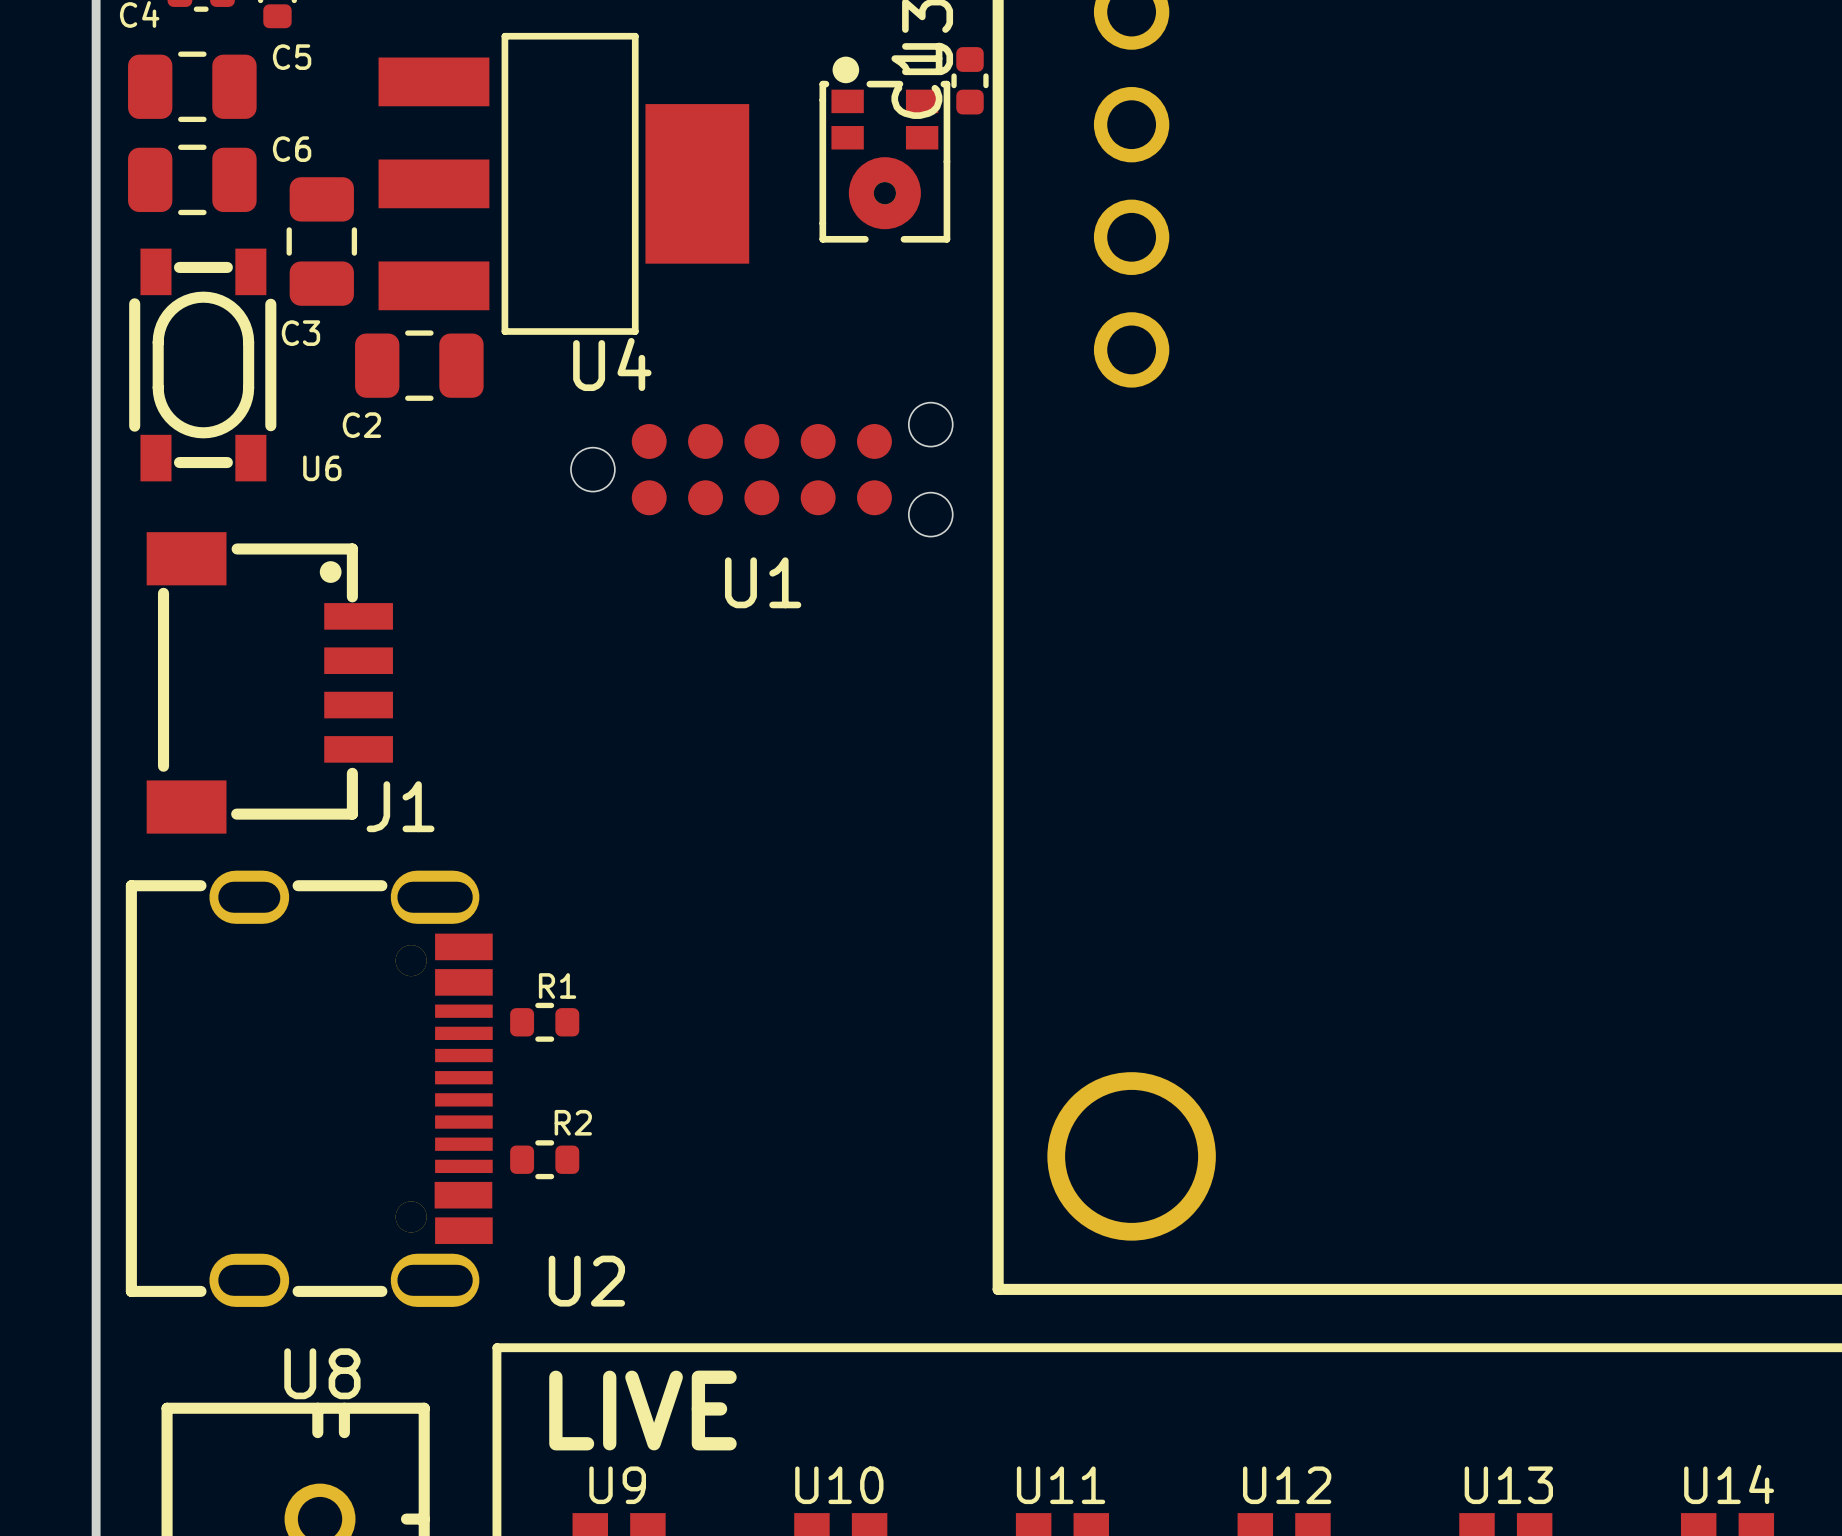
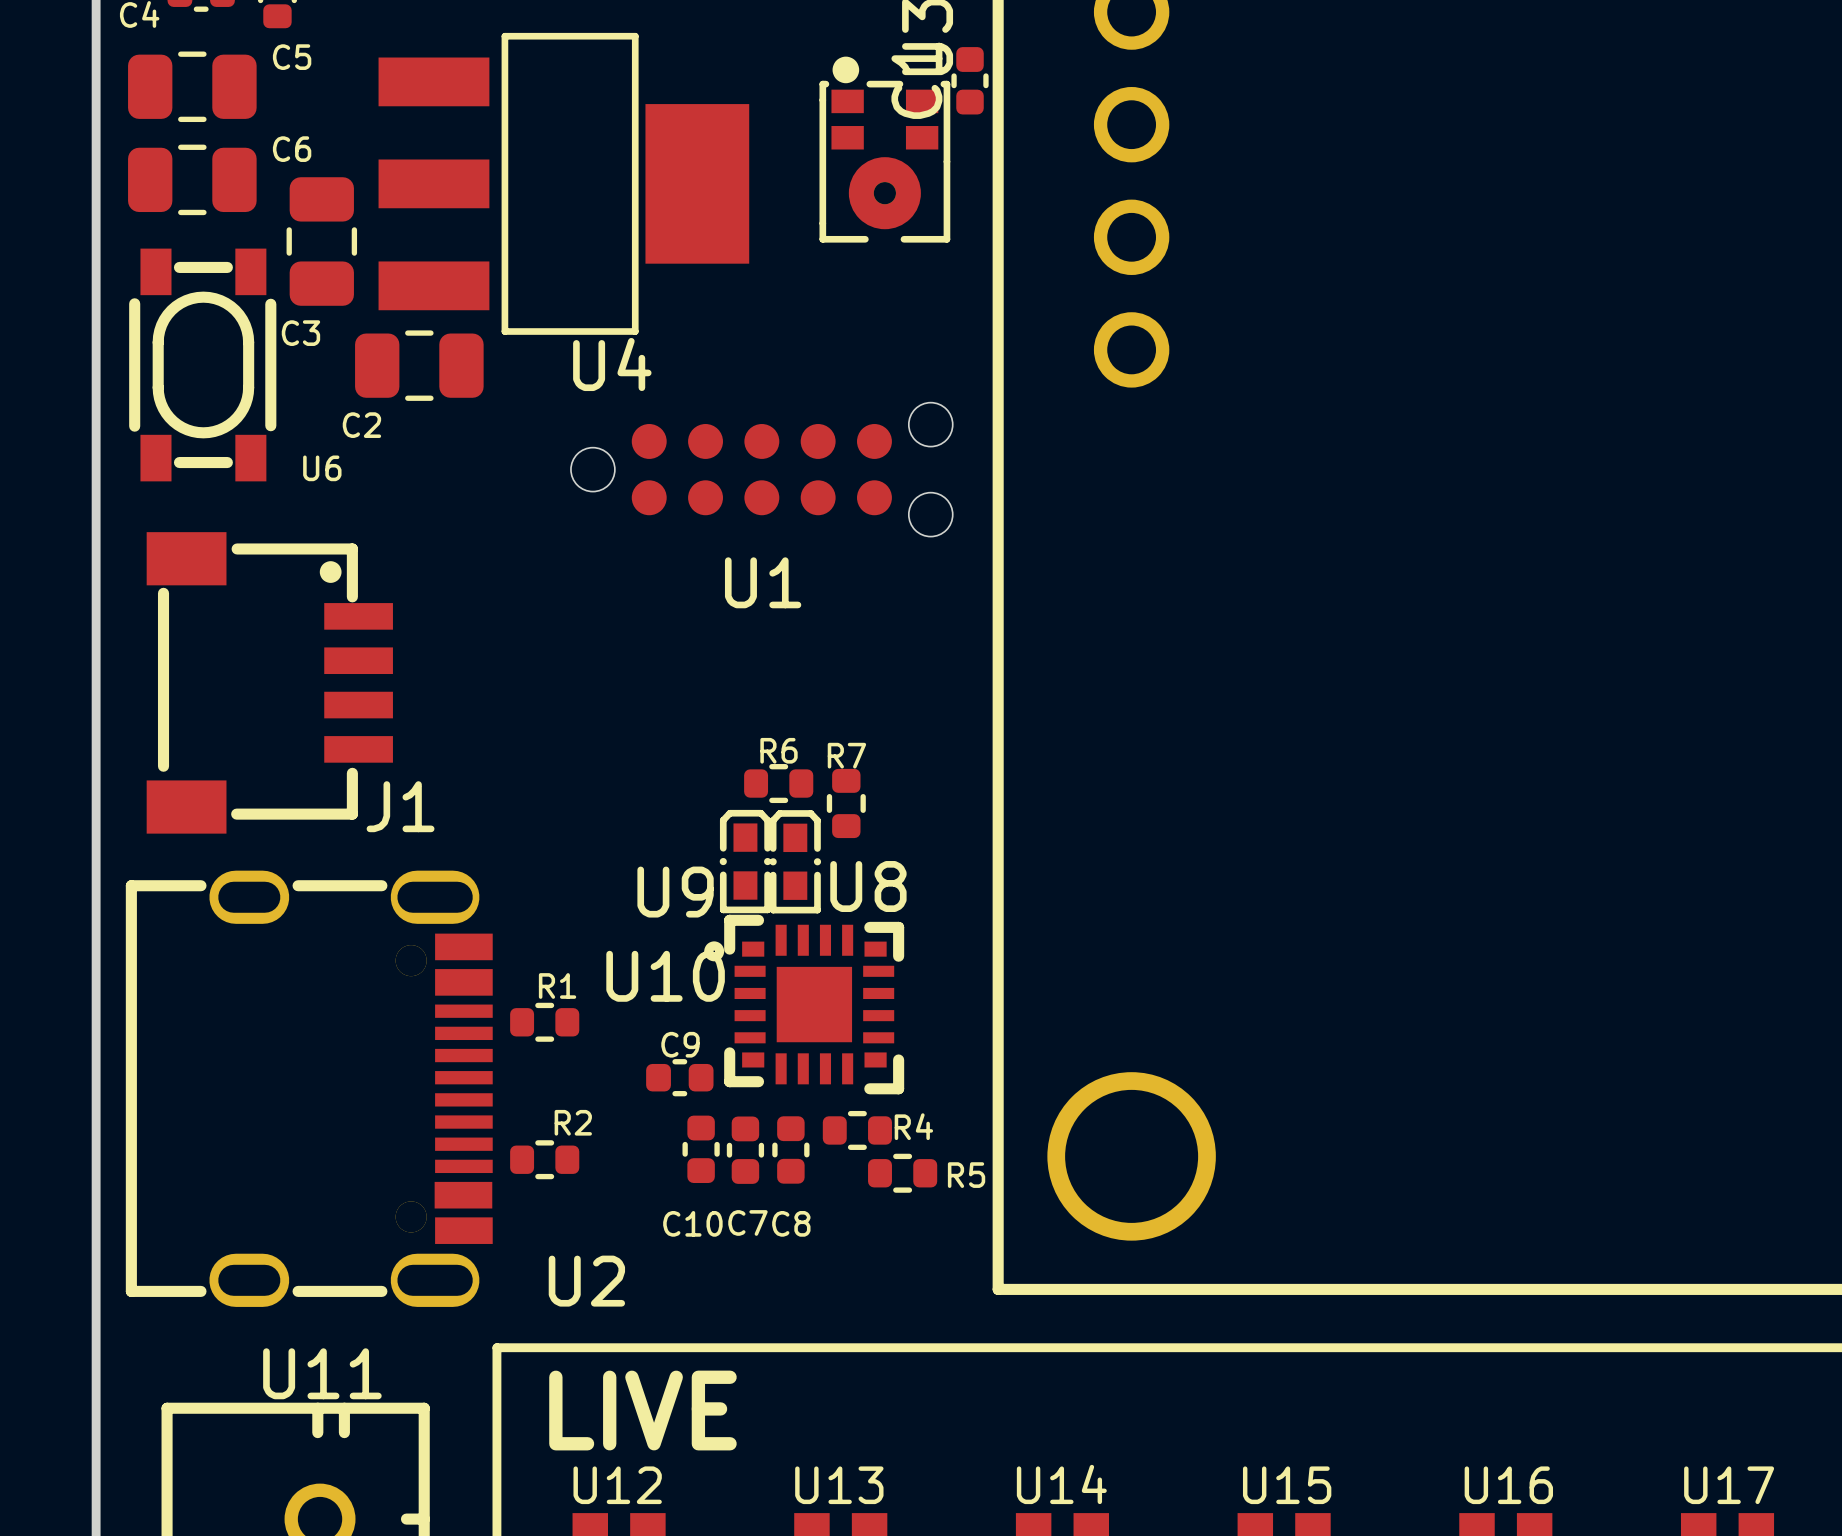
R6: none -> (778, 783)
R7: none -> (846, 803)
U9: none -> (745, 861)
U8: none -> (795, 861)
U10: none -> (804, 1004)
C9: none -> (679, 1077)
R4: none -> (857, 1130)
C10: none -> (701, 1149)
C8: none -> (790, 1149)
C7: none -> (745, 1150)
R5: none -> (902, 1173)
U8 name: U8 (322, 1373) -> U11 (322, 1373)
U14 name: U14 (1729, 1484) -> U17 (1729, 1485)
U9 name: U9 (617, 1485) -> U12 (617, 1485)
U10 name: U10 (839, 1485) -> U13 (839, 1485)
U11 name: U11 (1061, 1485) -> U14 (1061, 1484)
U12 name: U12 (1287, 1485) -> U15 (1287, 1485)
U13 name: U13 (1508, 1485) -> U16 (1508, 1485)

